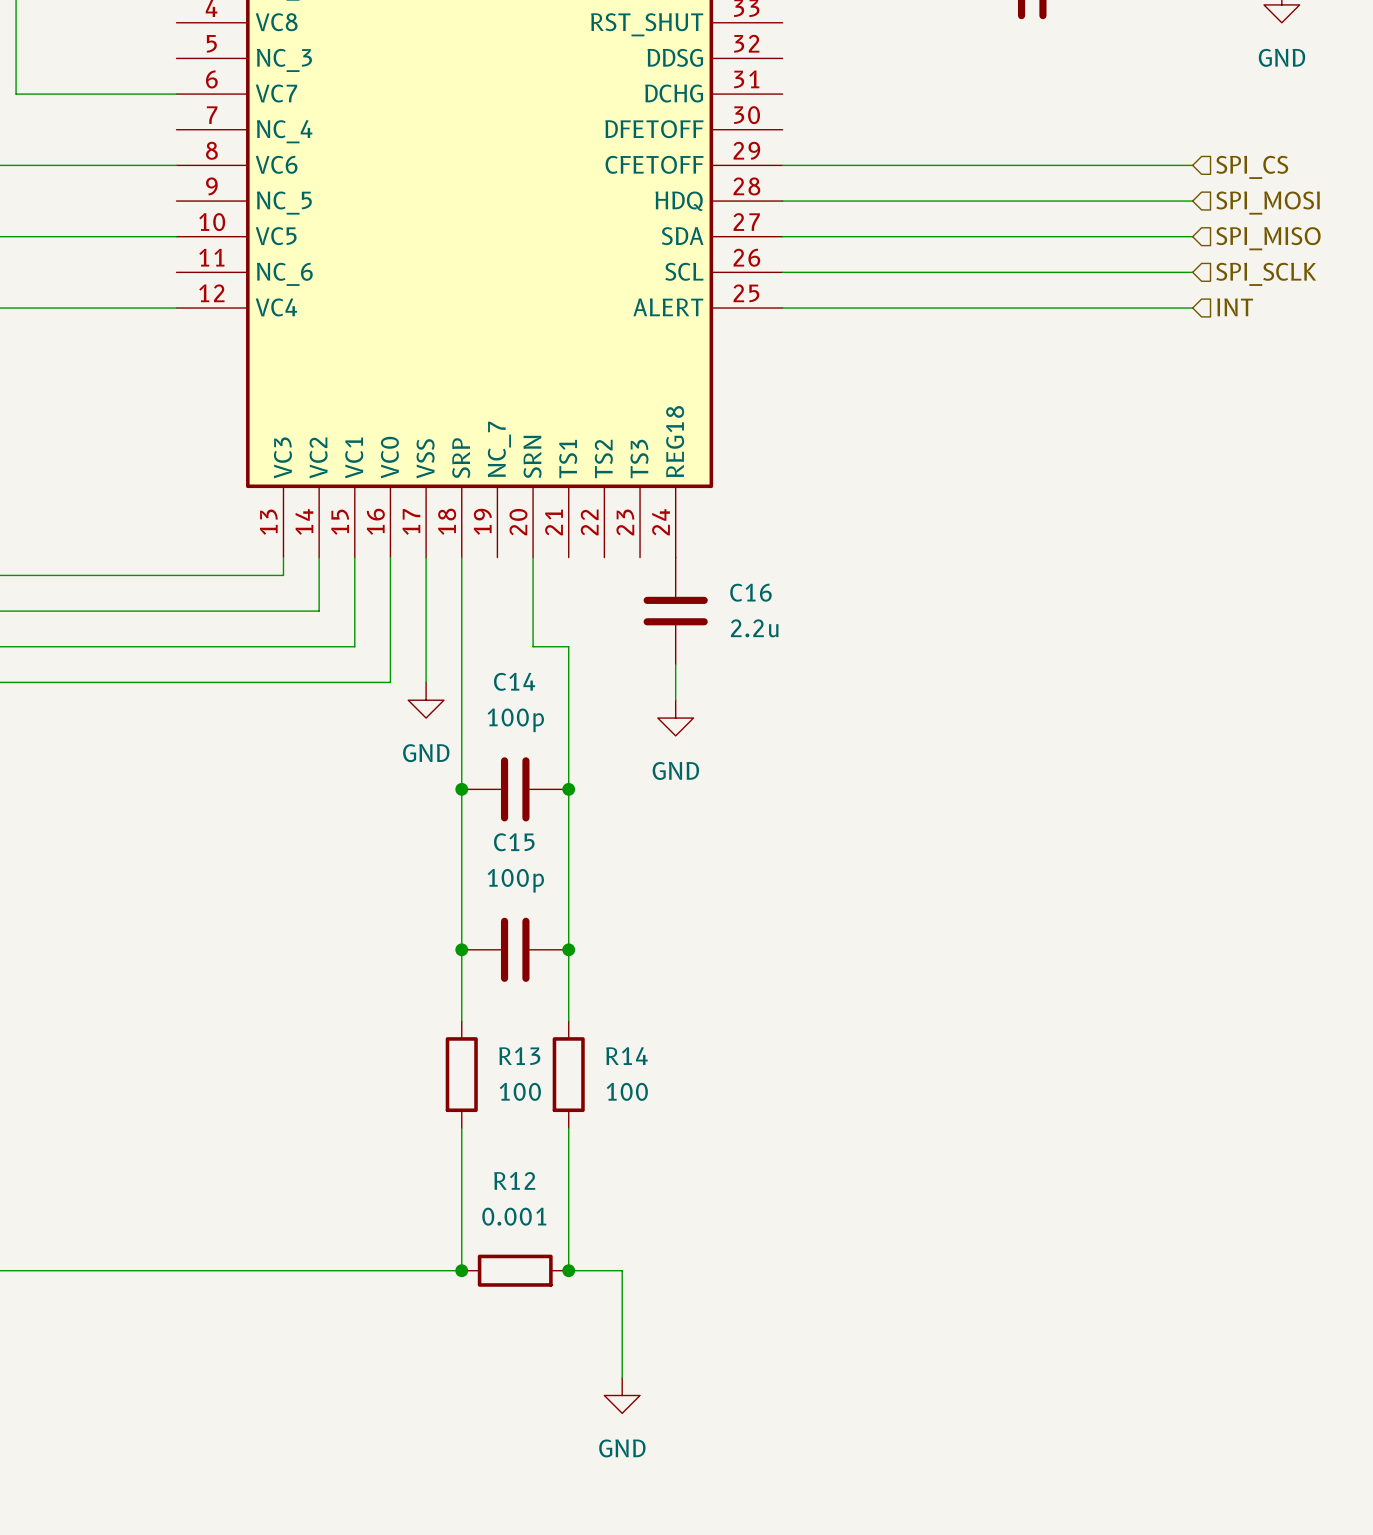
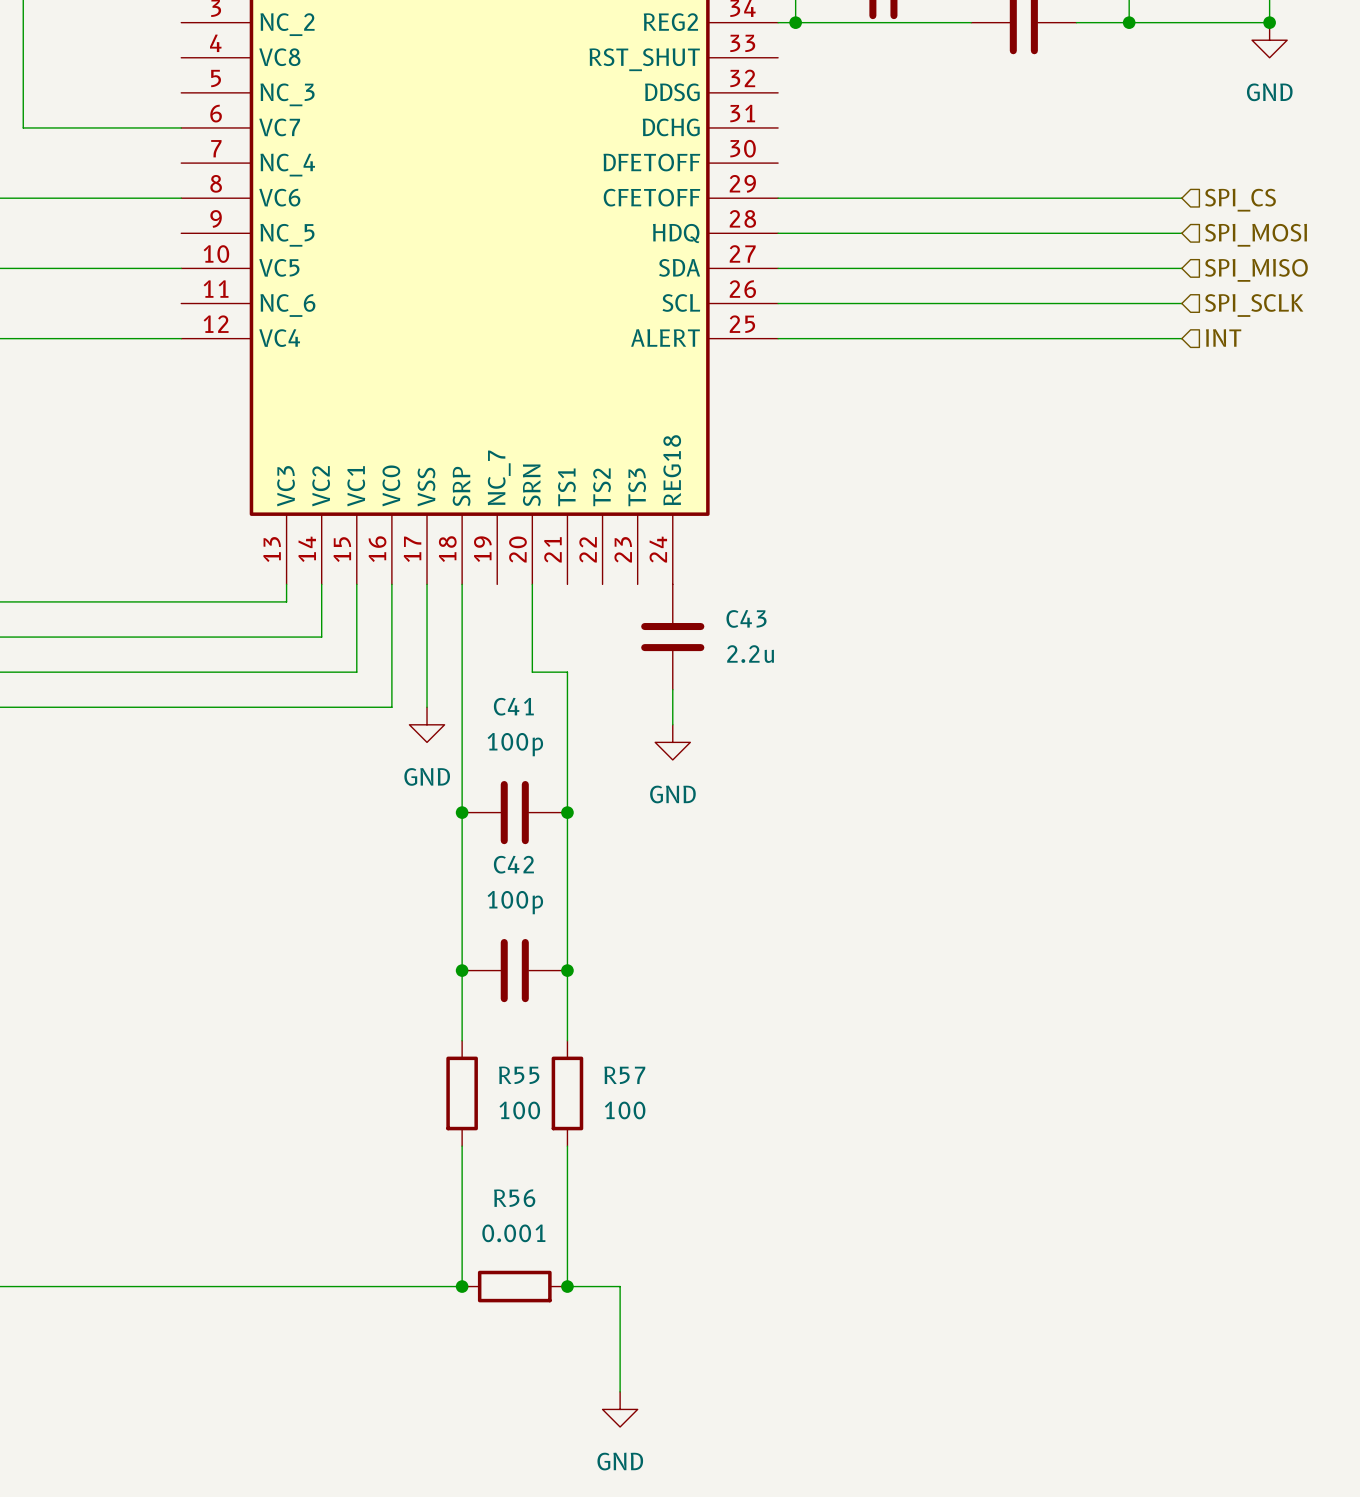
C16 name: C16 (750, 592) -> C43 (746, 618)
C14 name: C14 (514, 681) -> C41 (513, 706)
C15 name: C15 (514, 842) -> C42 (513, 864)
R13 name: R13 (519, 1056) -> R55 (519, 1075)
R14 name: R14 (626, 1056) -> R57 (624, 1075)
R12 name: R12 (514, 1180) -> R56 (514, 1198)

